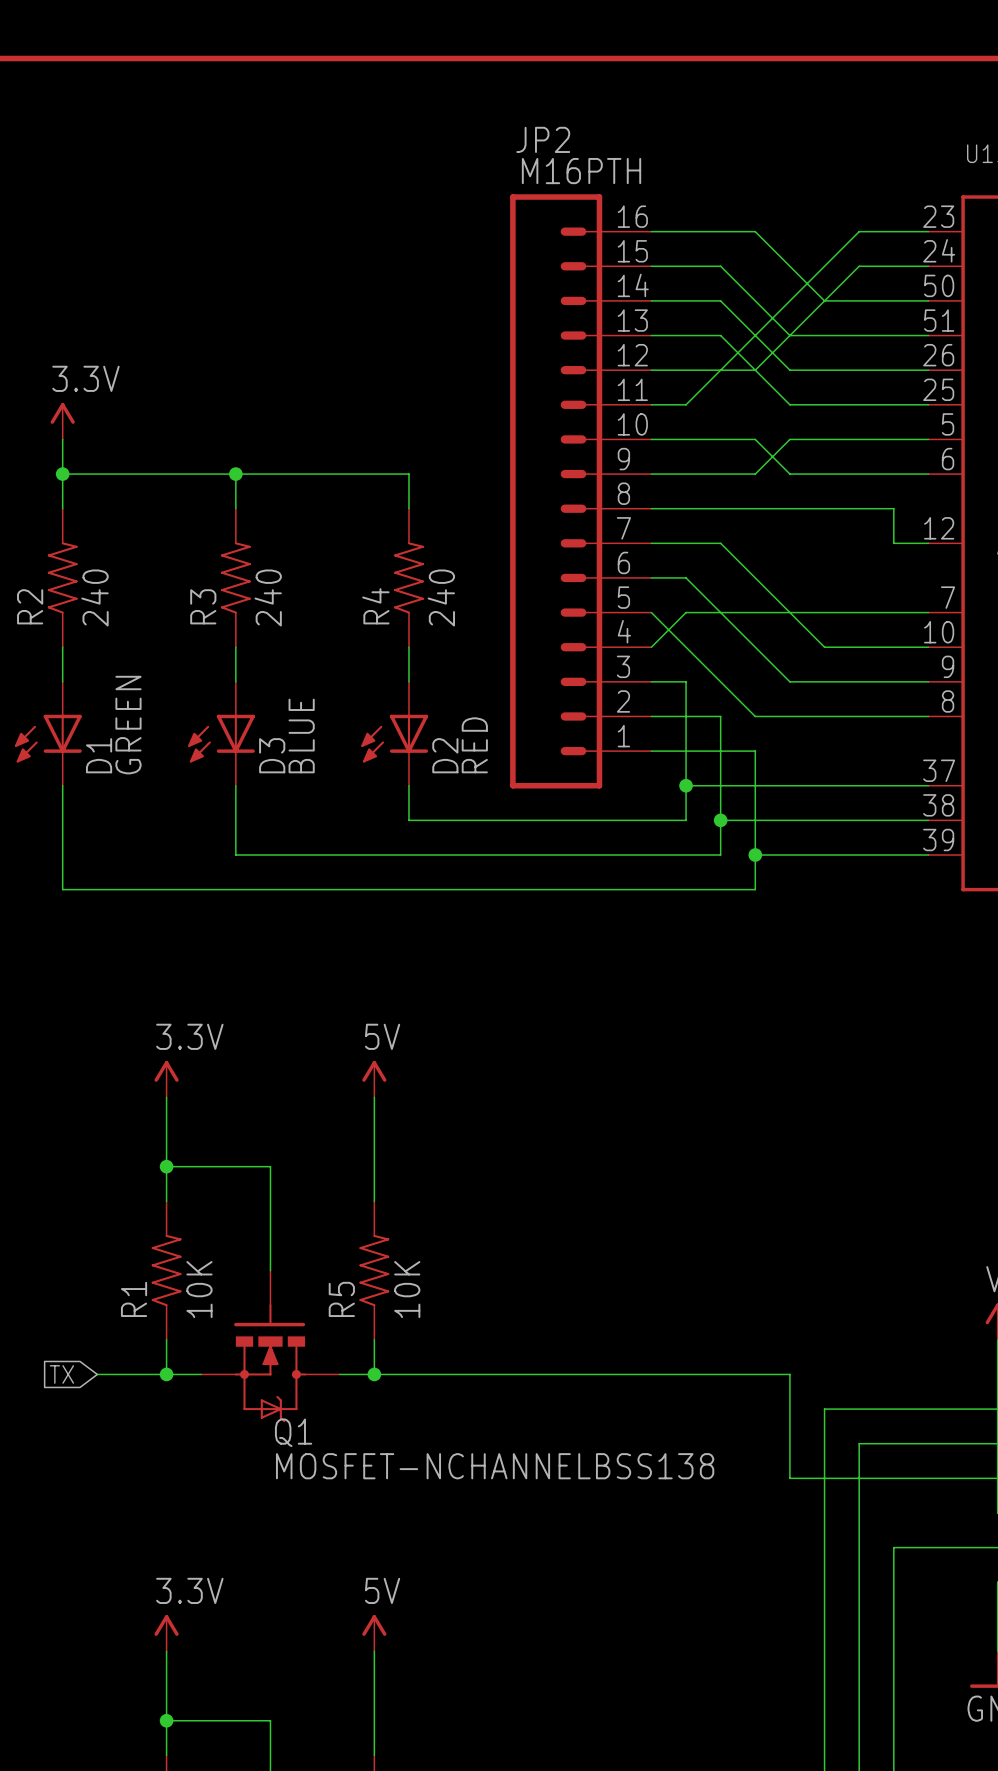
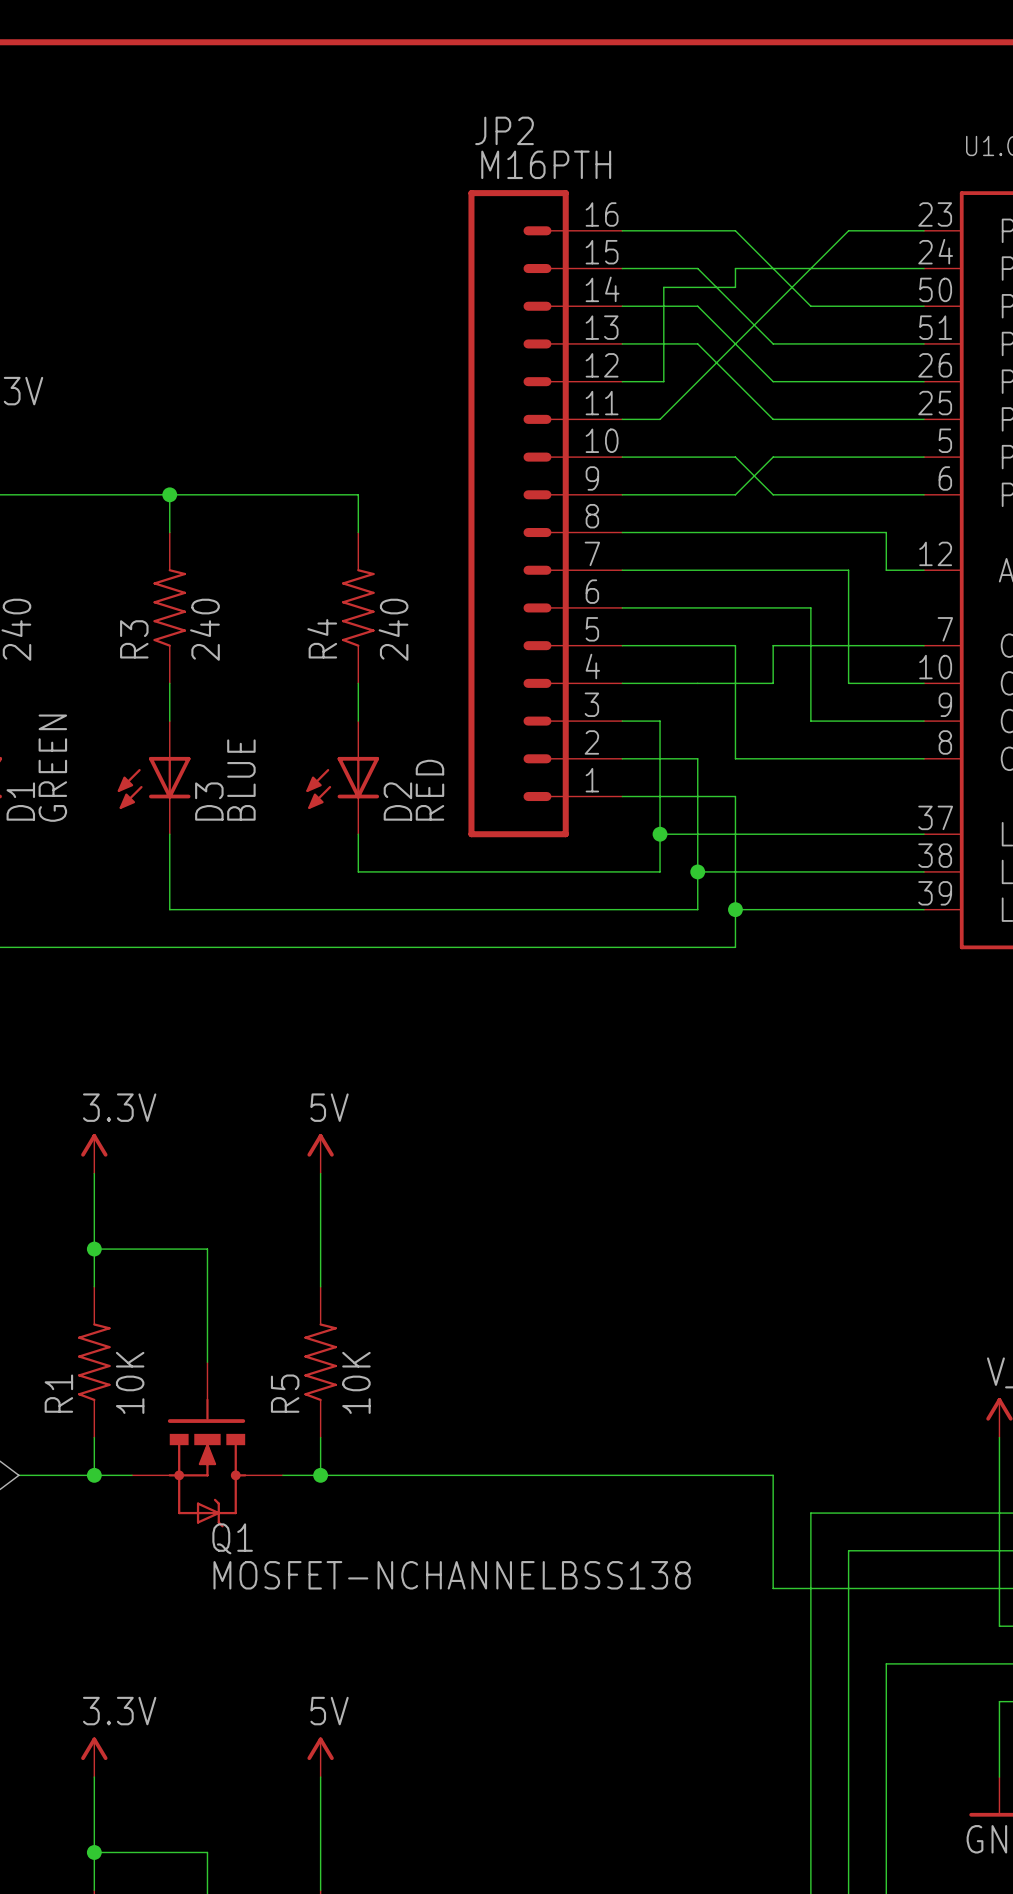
wire: (859, 266) (755, 370) (689, 370) -> (848, 268) (735, 268) (735, 287) (663, 287) (663, 381)
wire: (720, 543) (824, 647) (859, 647) -> (697, 570) (848, 570) (848, 683)
wire: (686, 577) (789, 681) (824, 681) -> (660, 607) (810, 607) (810, 721)
wire: (651, 612) (755, 716) -> (735, 645) (735, 758)
wire: (686, 612) (651, 647) -> (660, 645) (622, 645)
wire: (755, 612) (789, 612) -> (622, 683) (773, 683) (773, 645)

